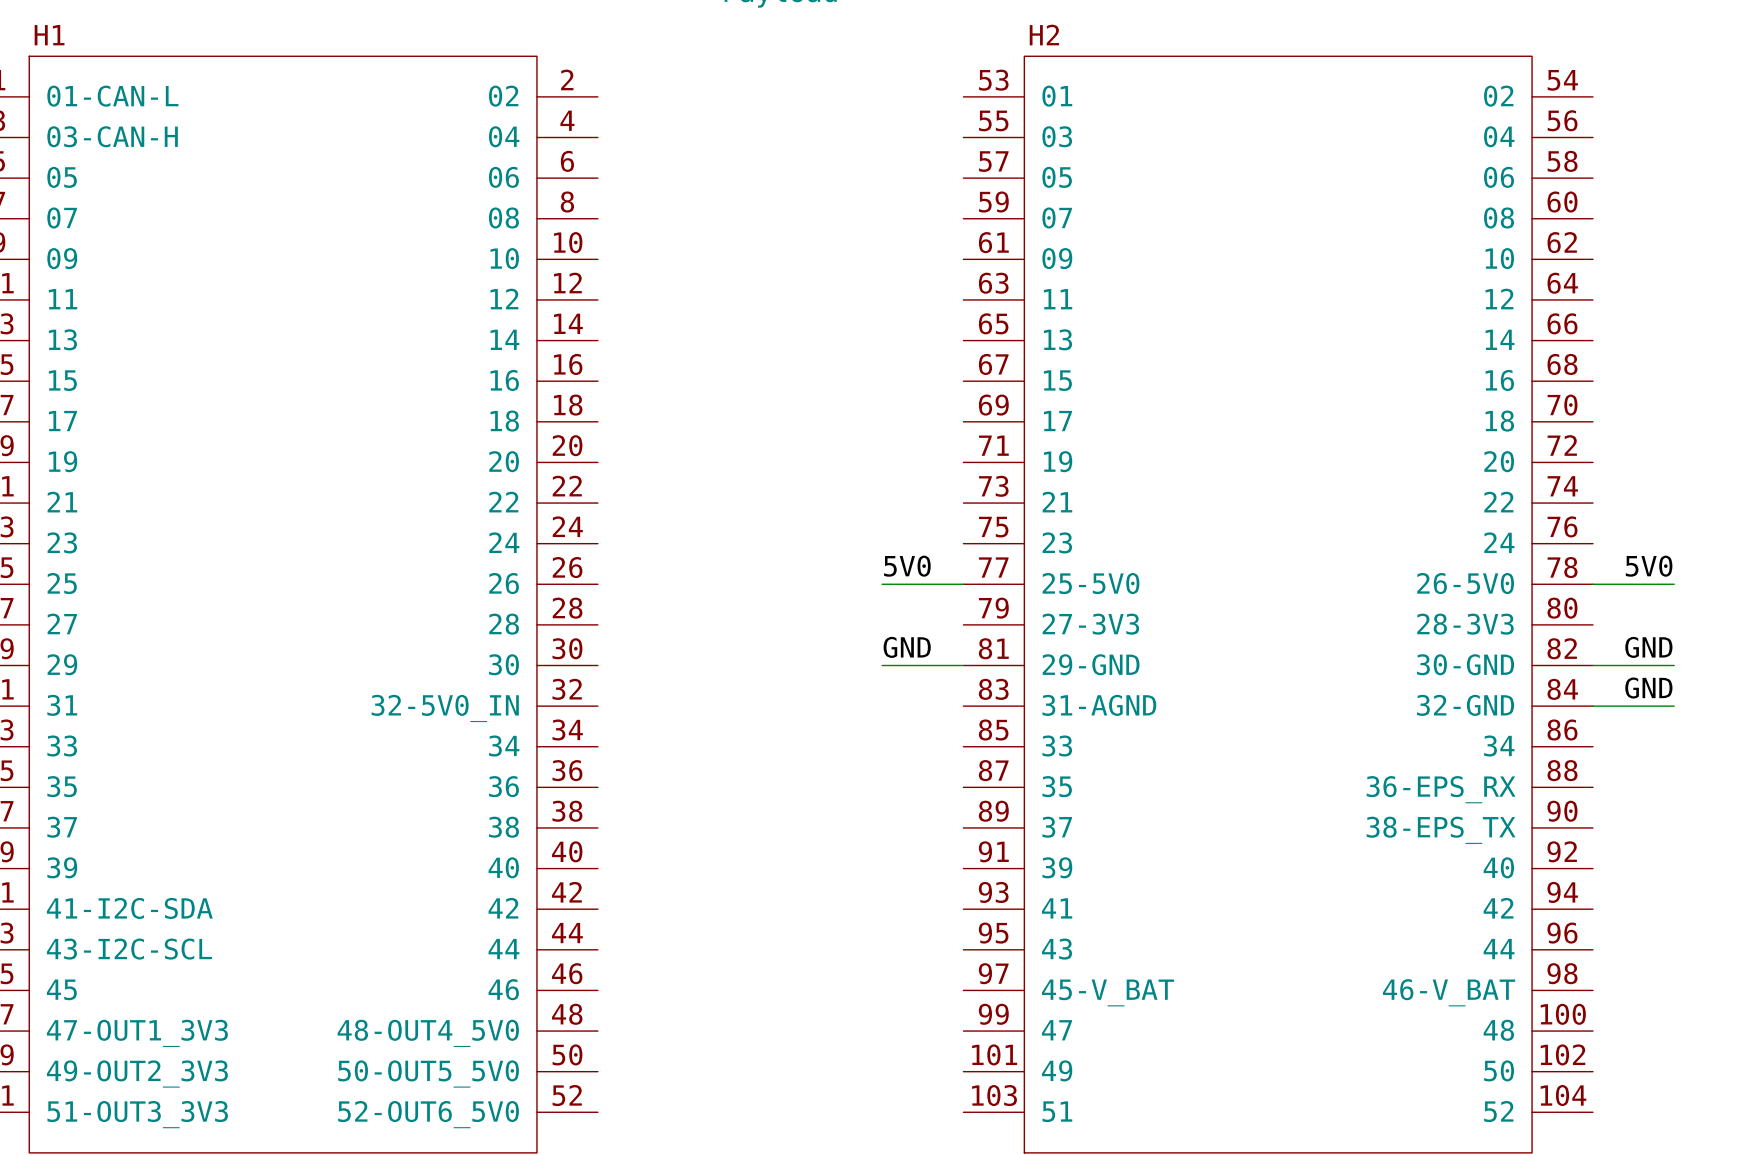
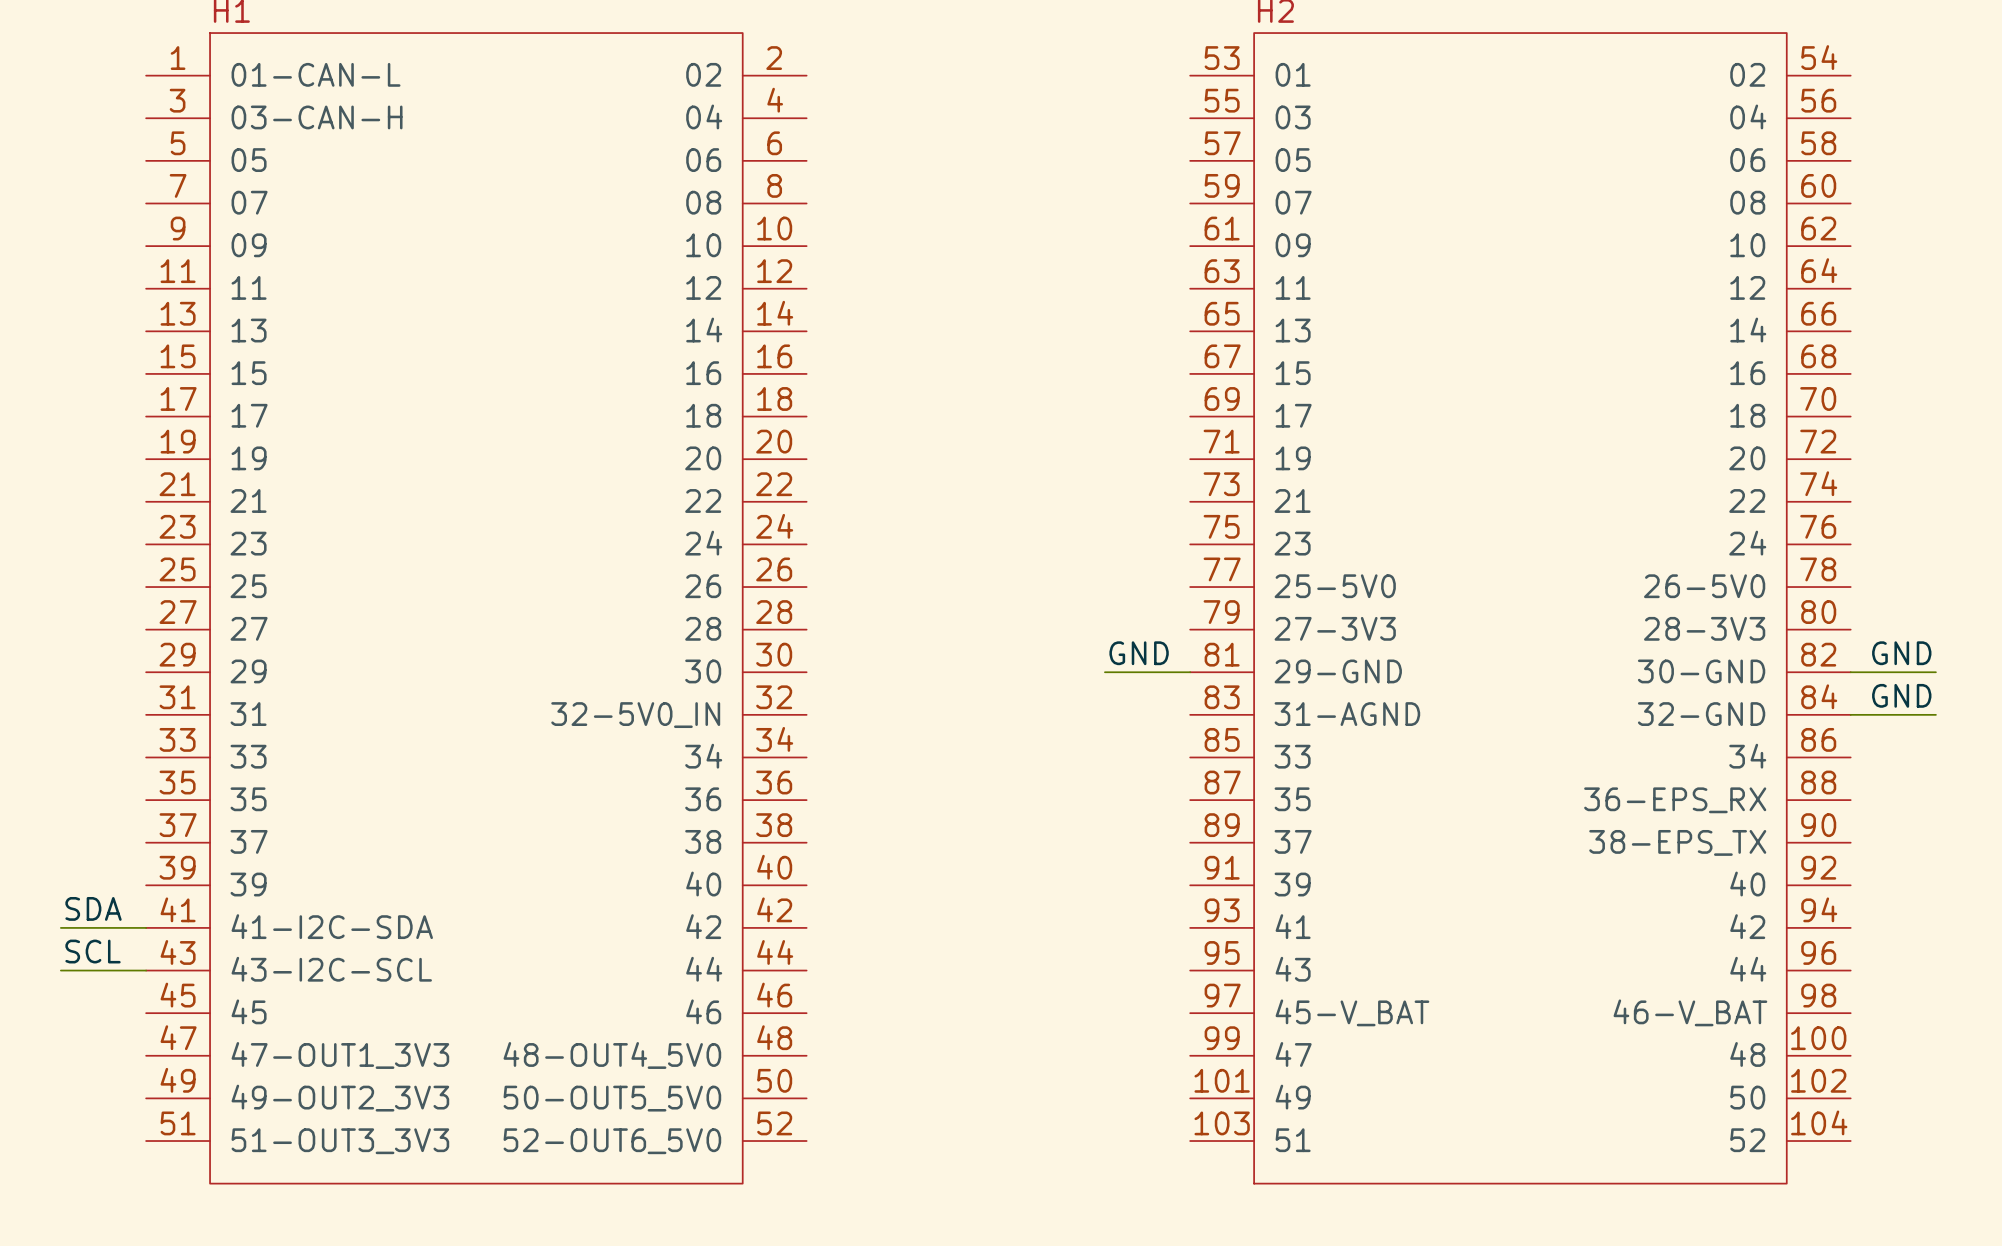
label: 5V0 (907, 566) -> none
label: 5V0 (1649, 566) -> none
wire: (882, 584) (963, 584) -> none
wire: (1592, 584) (1674, 584) -> none

